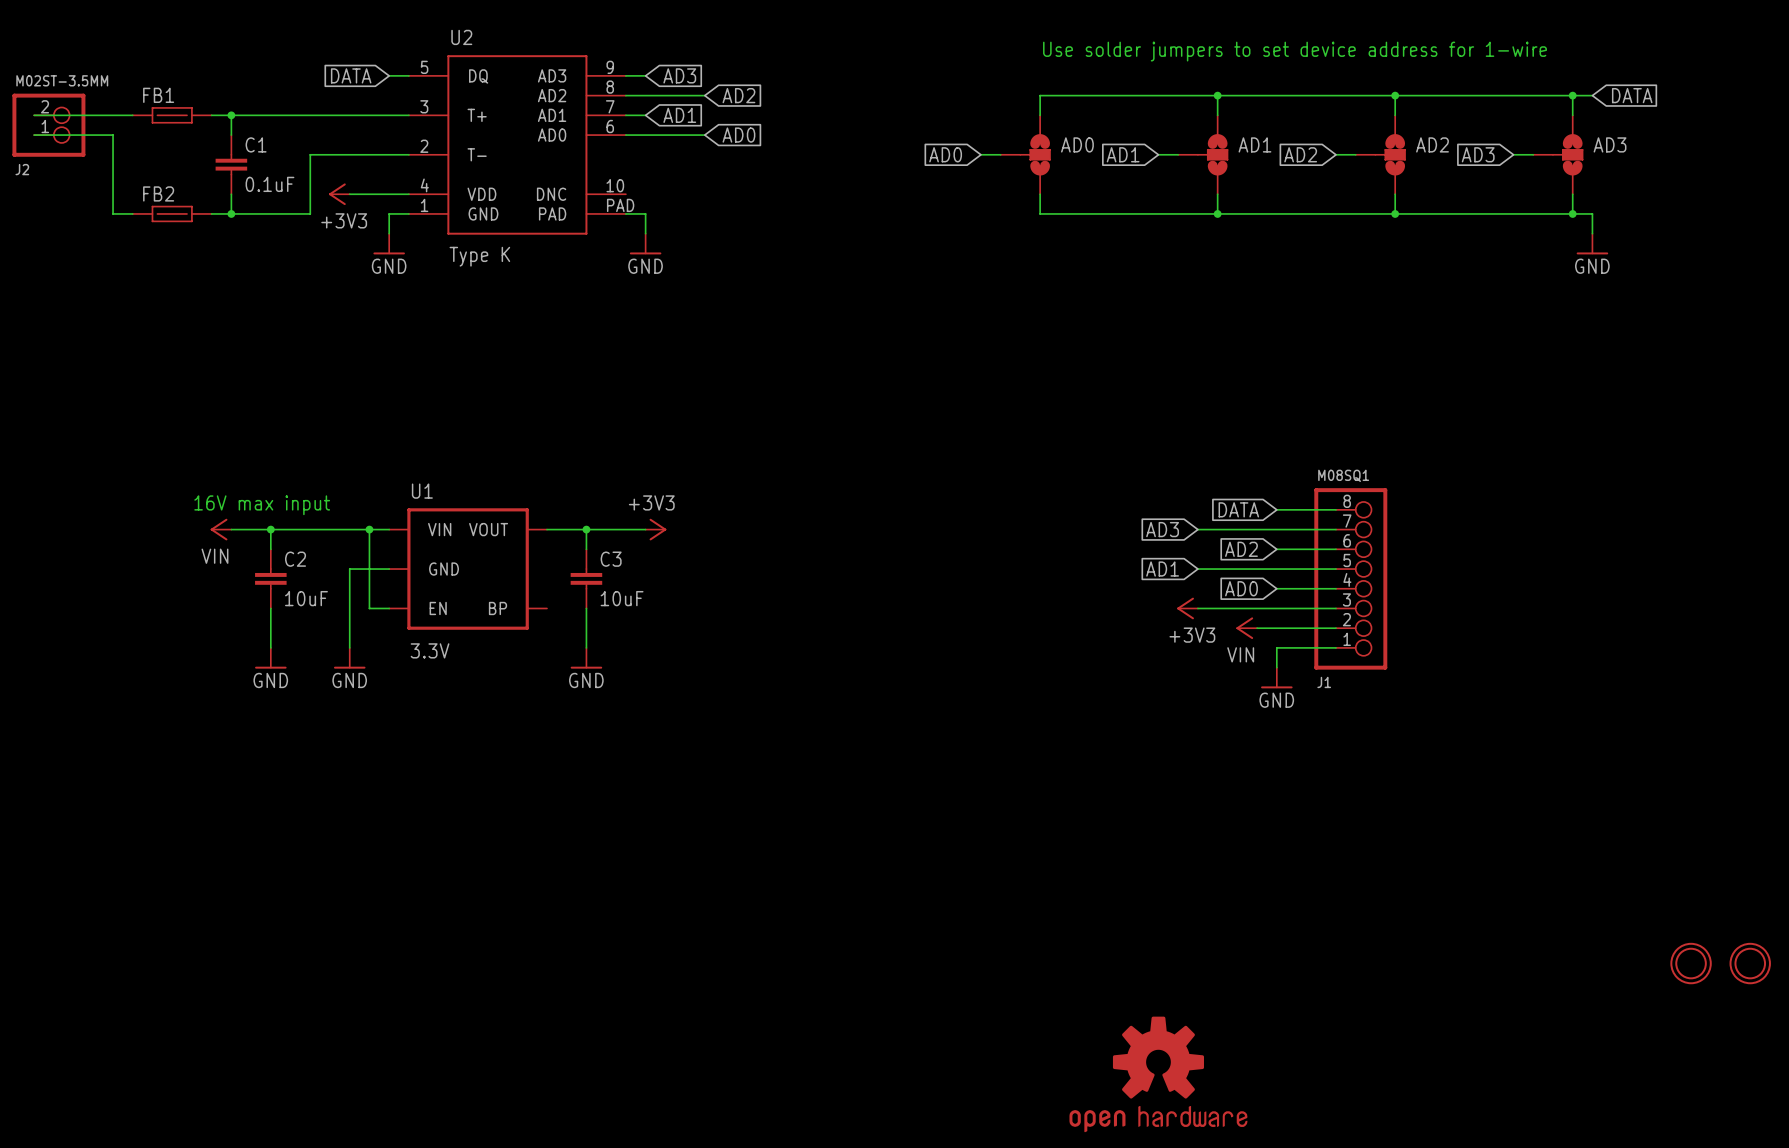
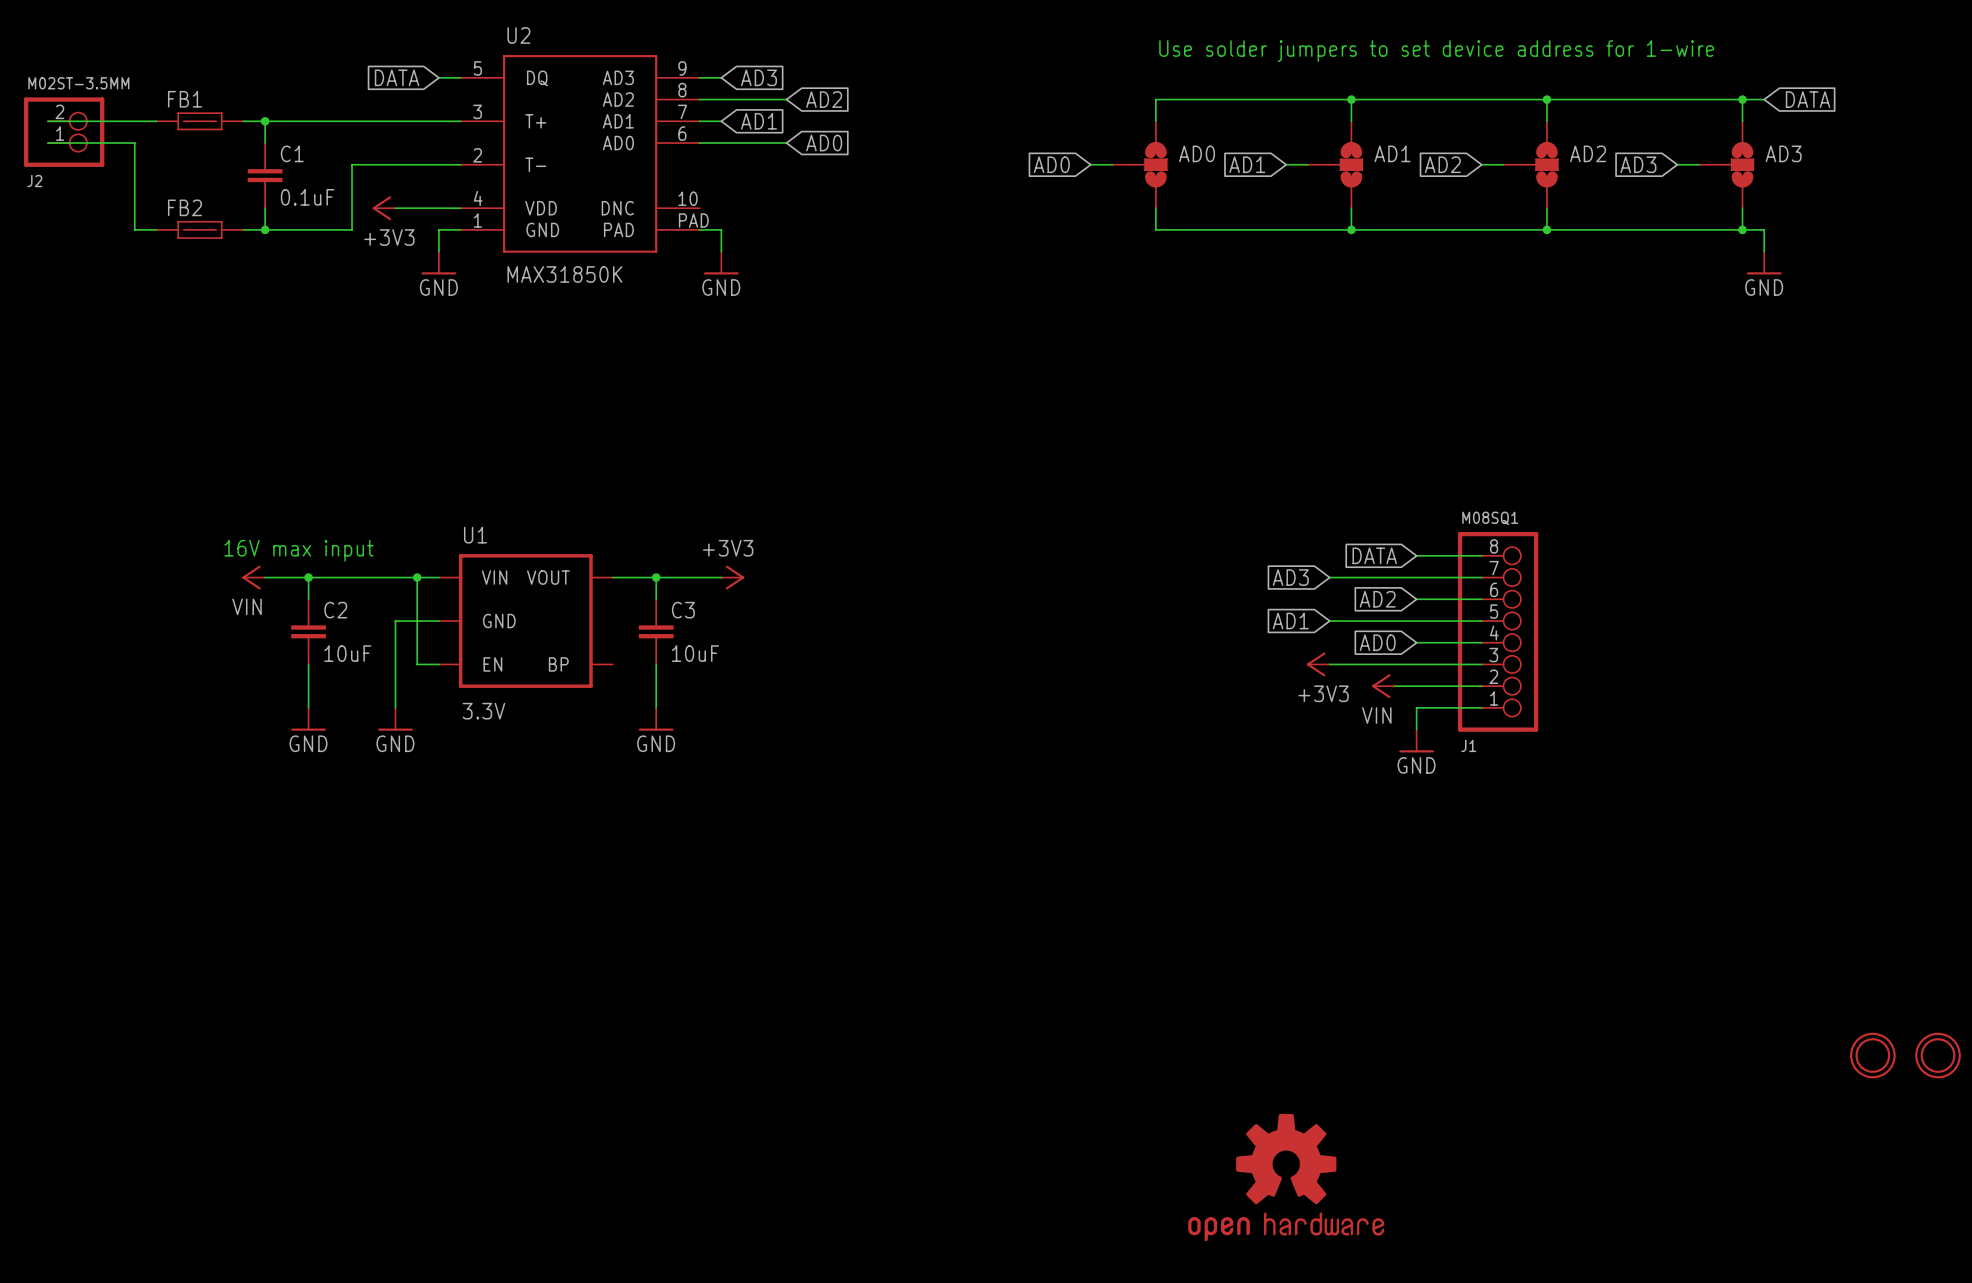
U2 value: Type K (479, 256) -> MAX31850K (564, 274)

